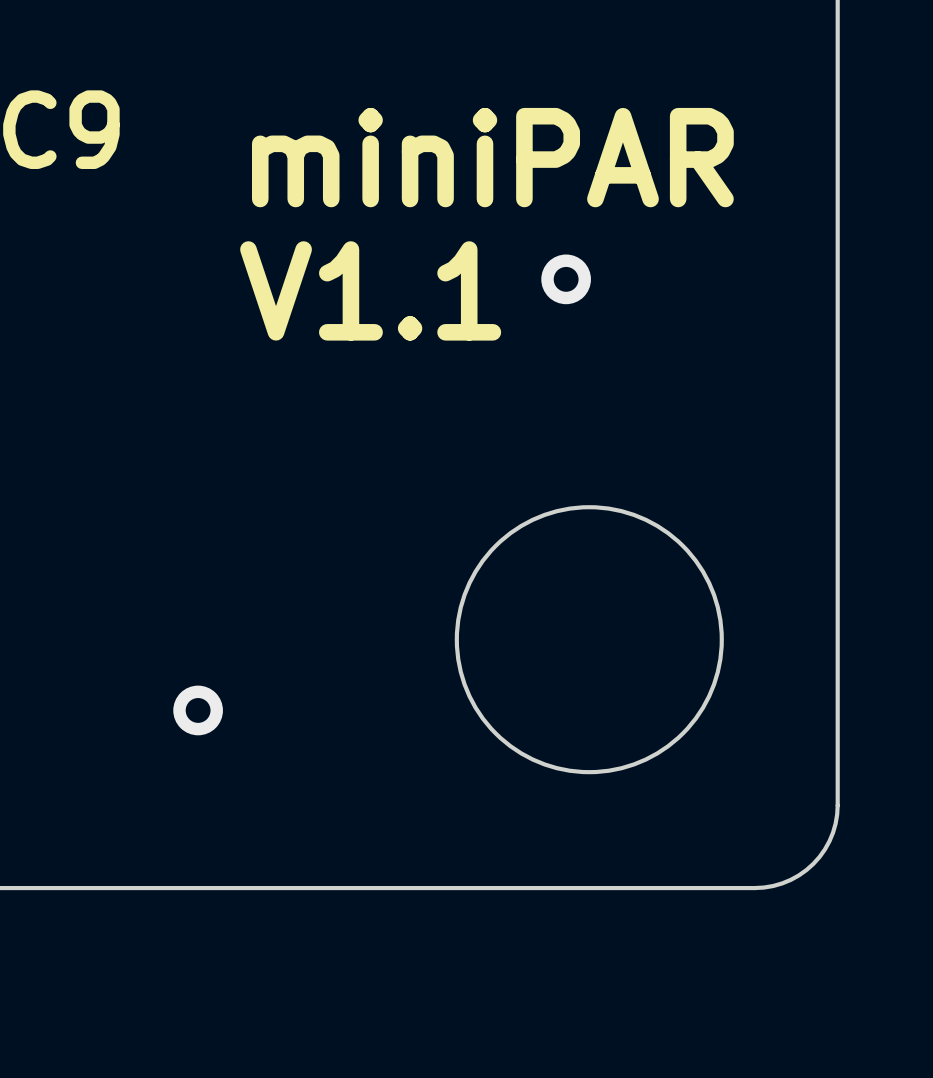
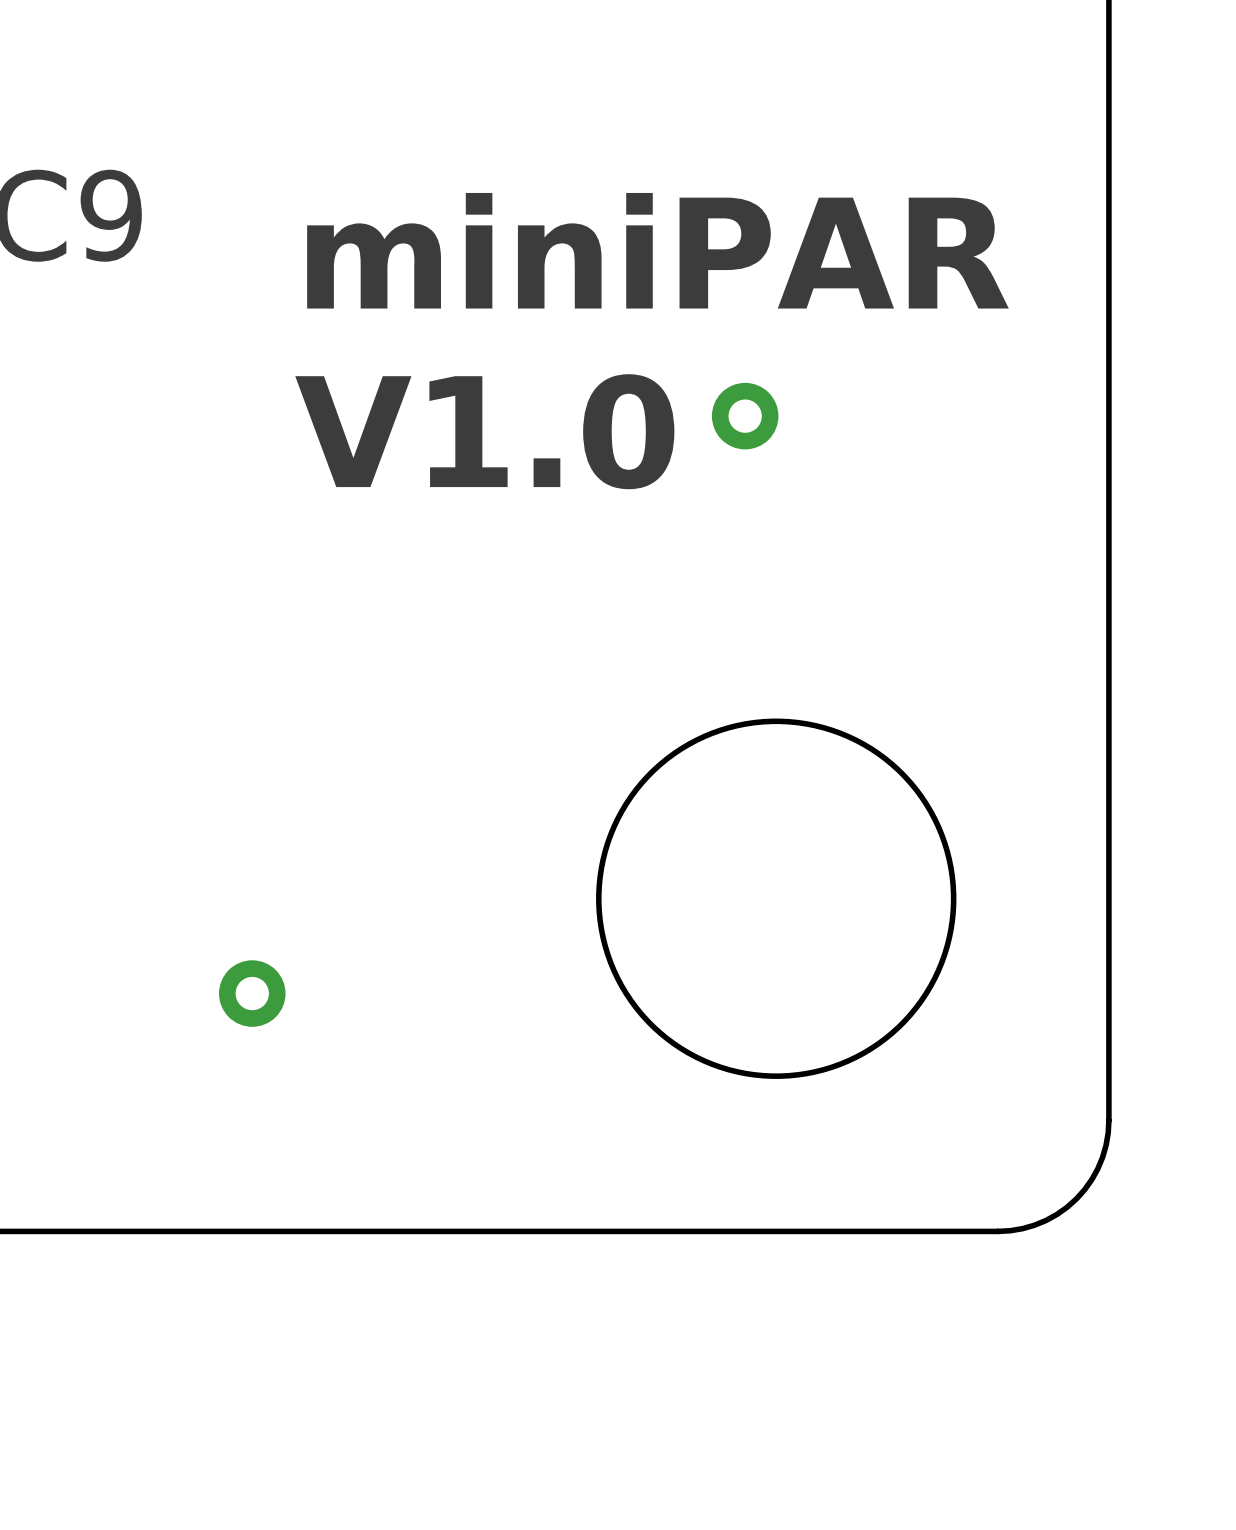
text: V1.1 (370, 290) -> V1.0 (484, 431)

